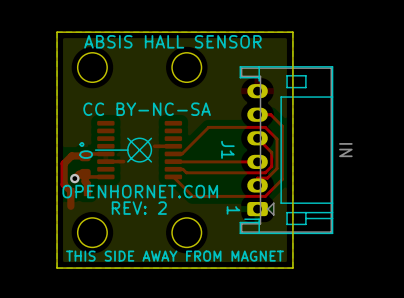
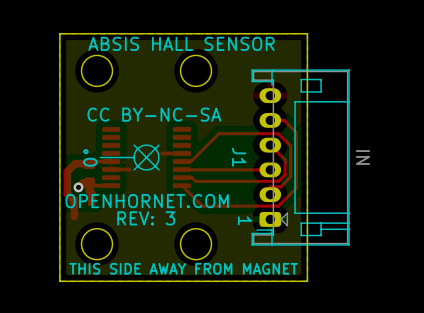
text: REV: 2 (139, 208) -> REV: 3 (146, 218)

